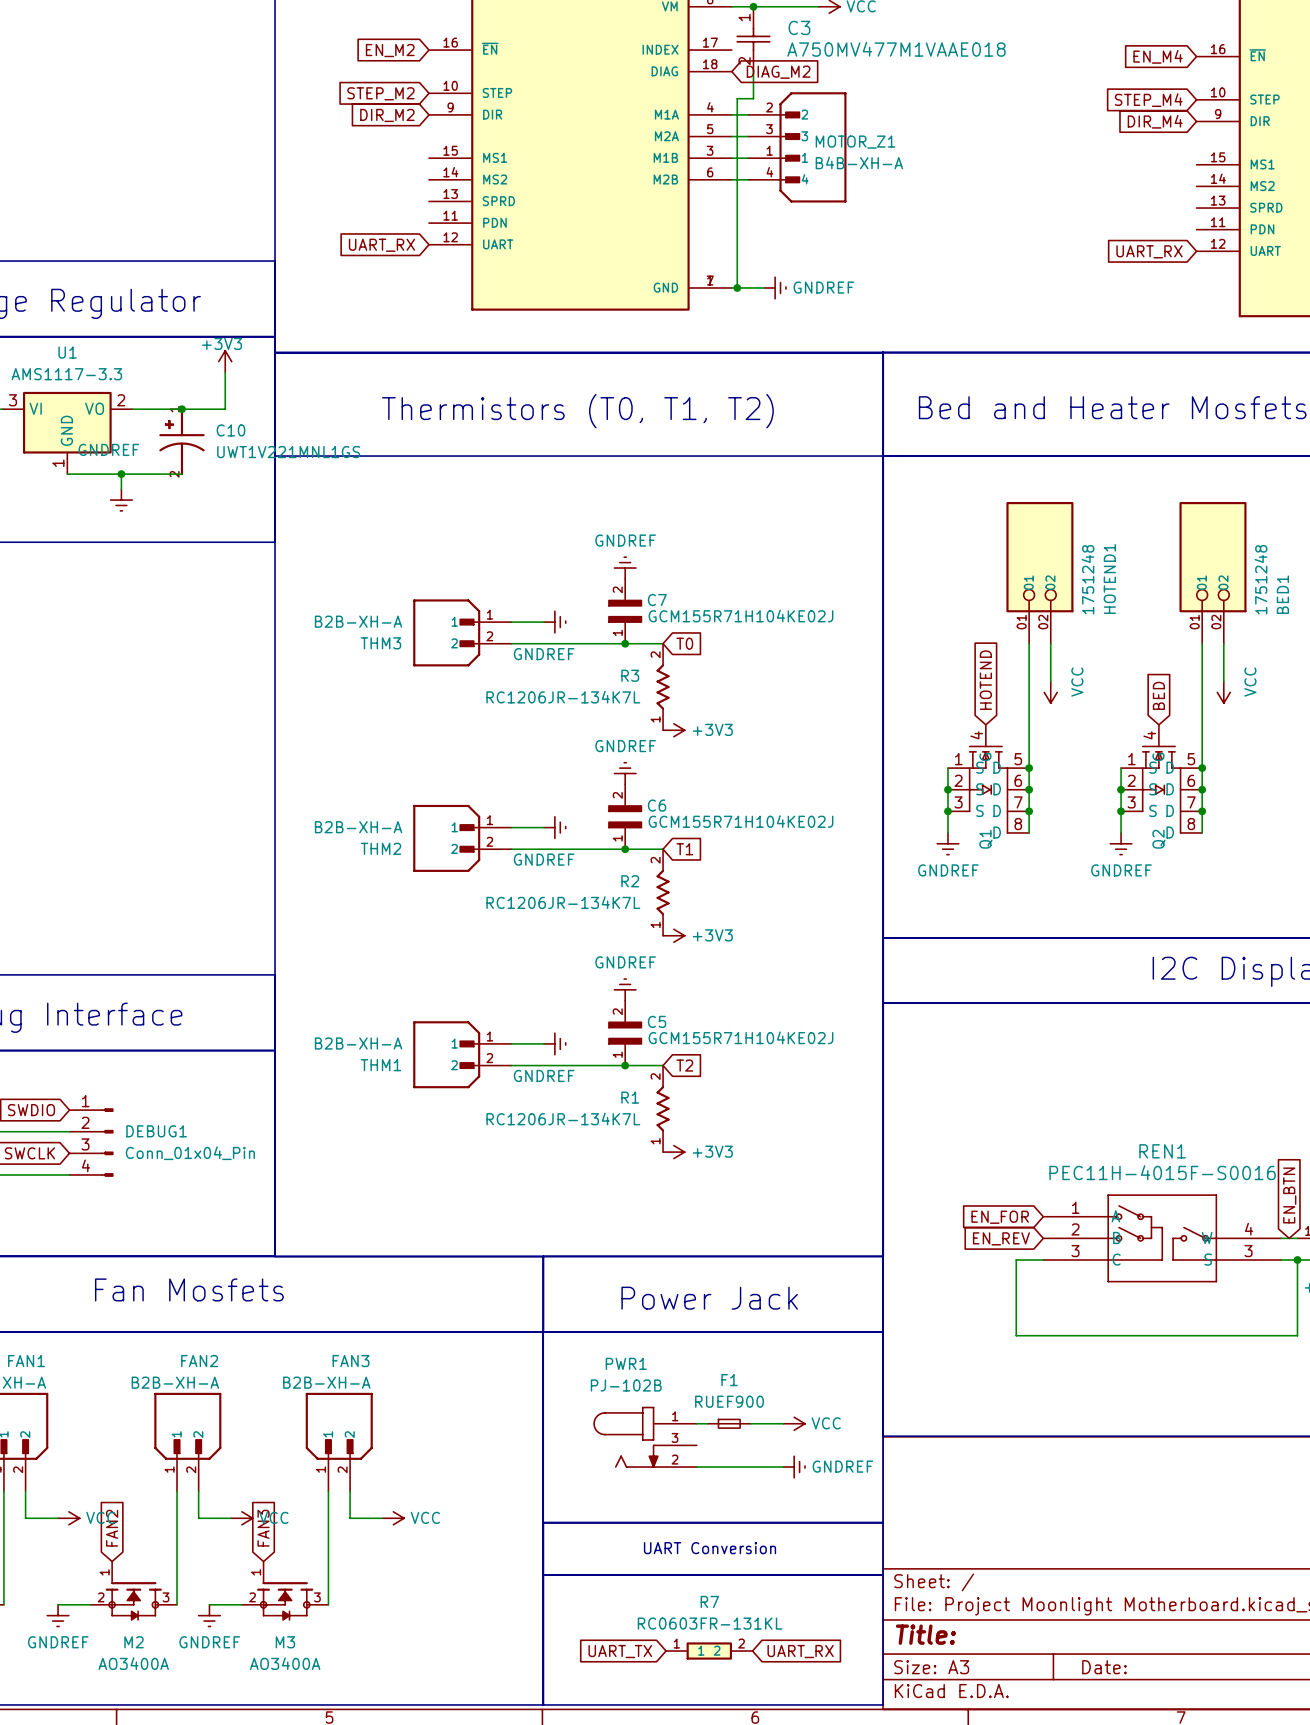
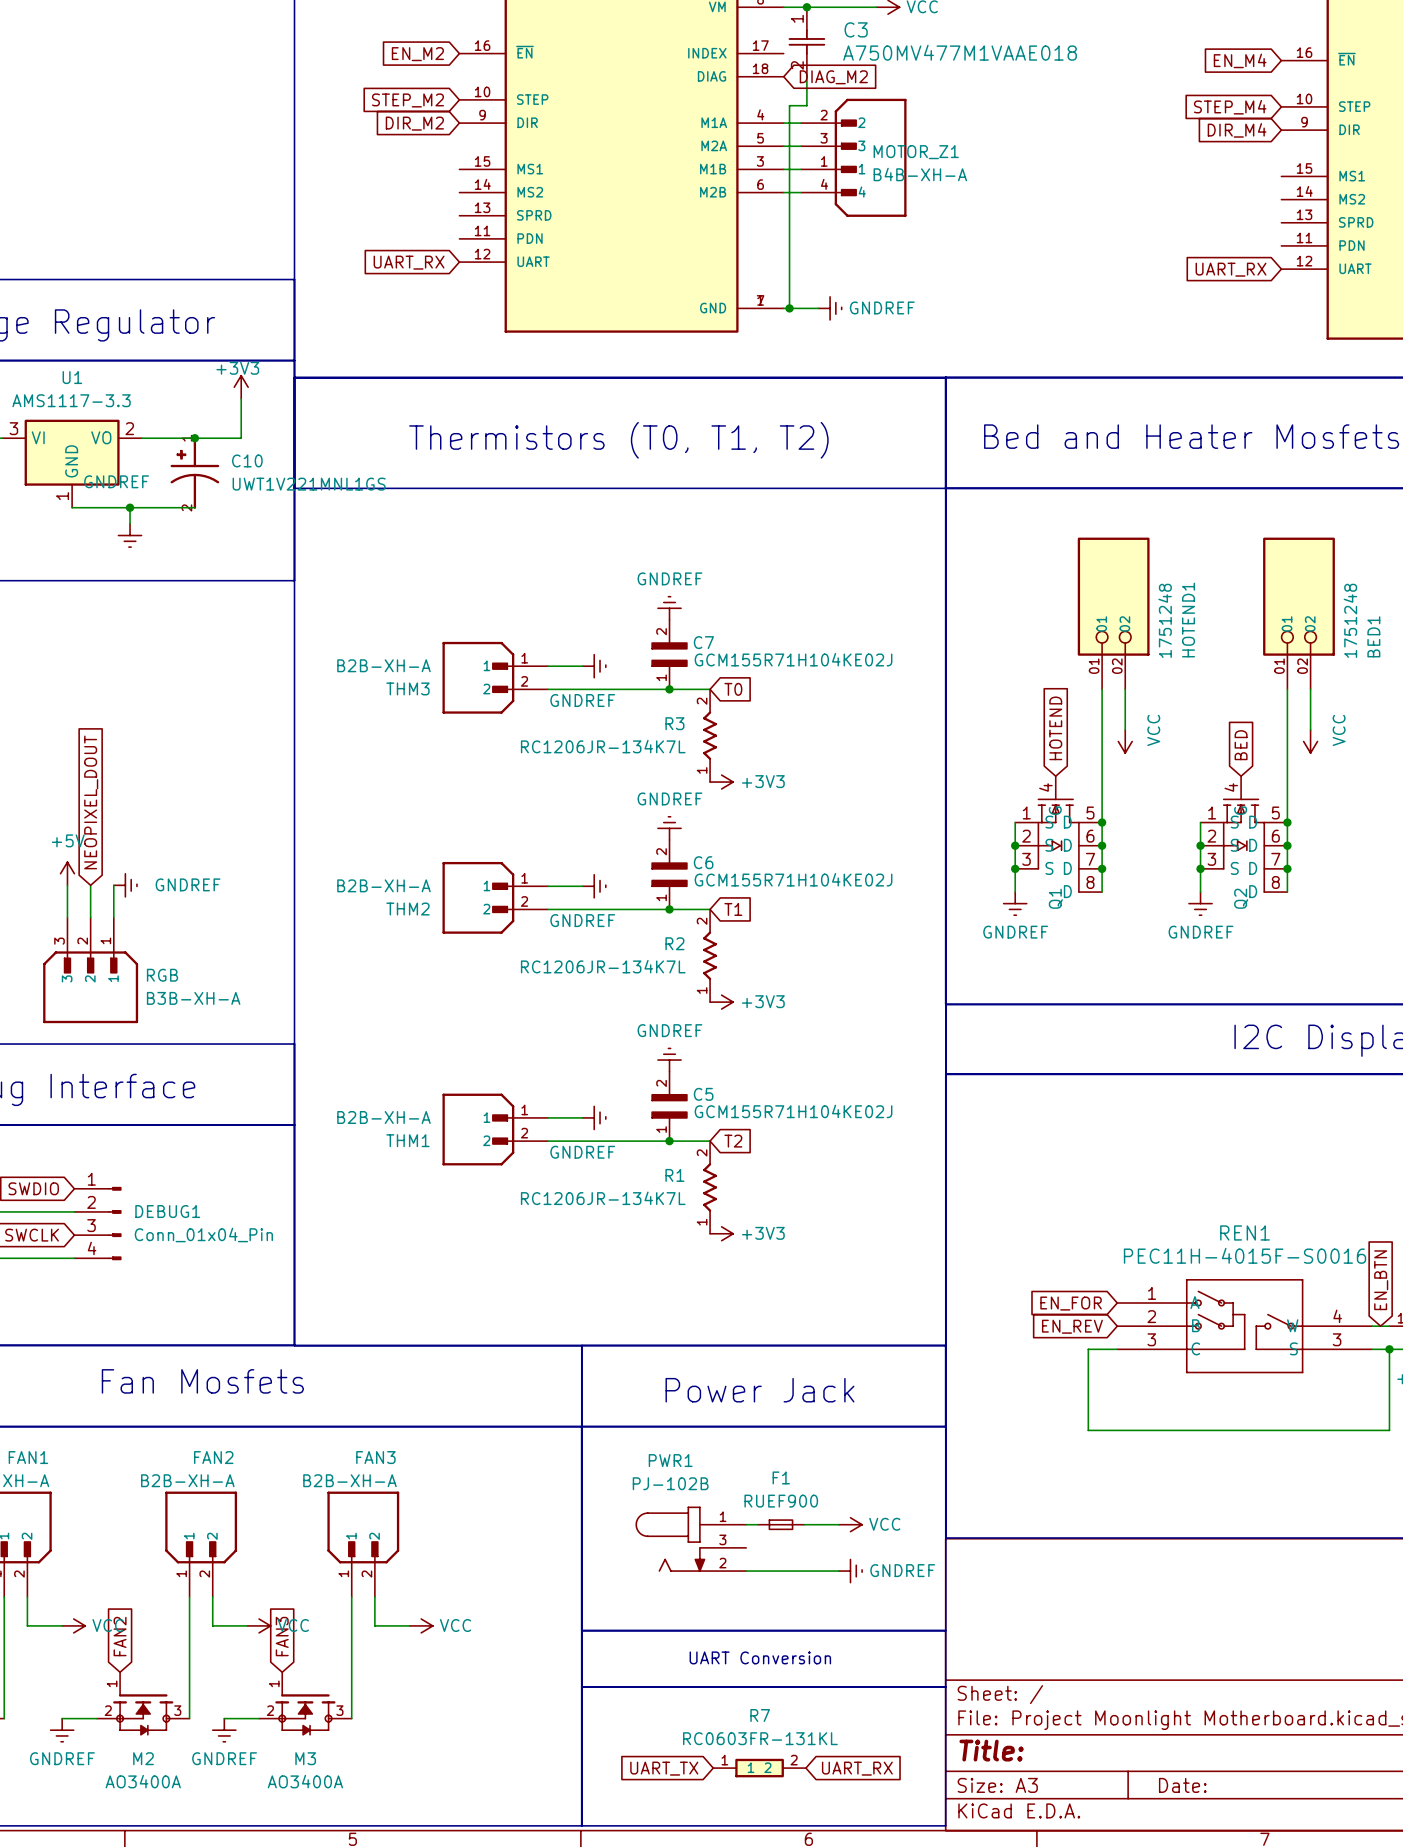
global label: none -> NEOPIXEL_DOUT (91, 802)
power symbol: none -> +5V (67, 873)
wire: none -> (67, 885) (67, 917)
wire: none -> (90, 885) (90, 917)
wire: none -> (113, 885) (113, 917)
power symbol: none -> GNDREF (125, 885)
RGB: none -> B3B-XH-A (90, 970)

